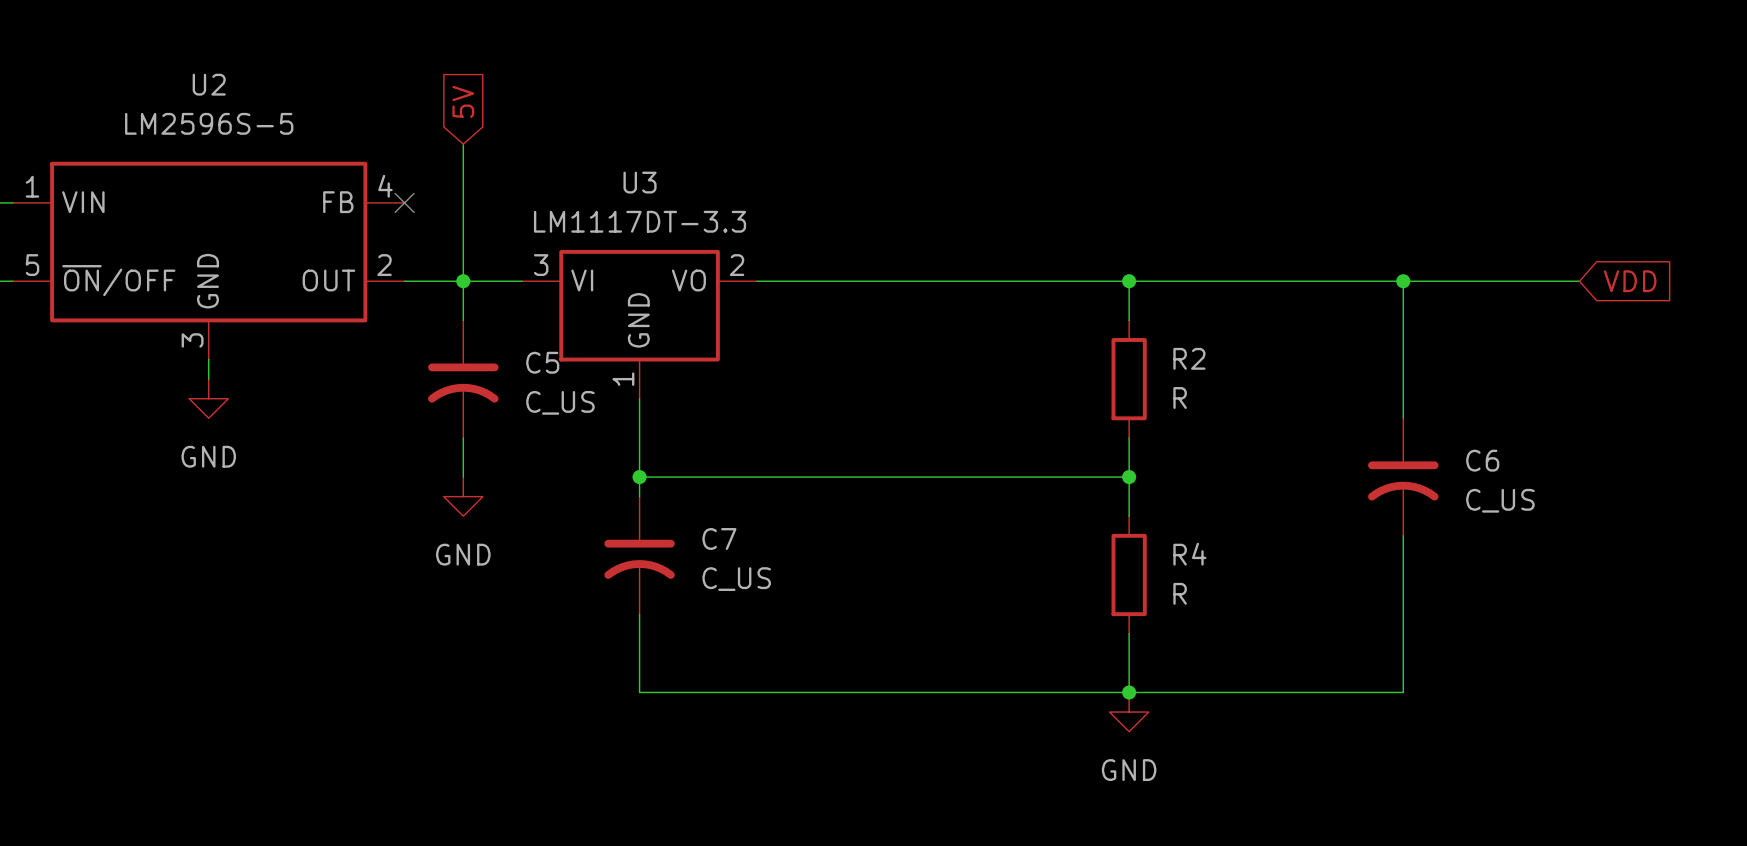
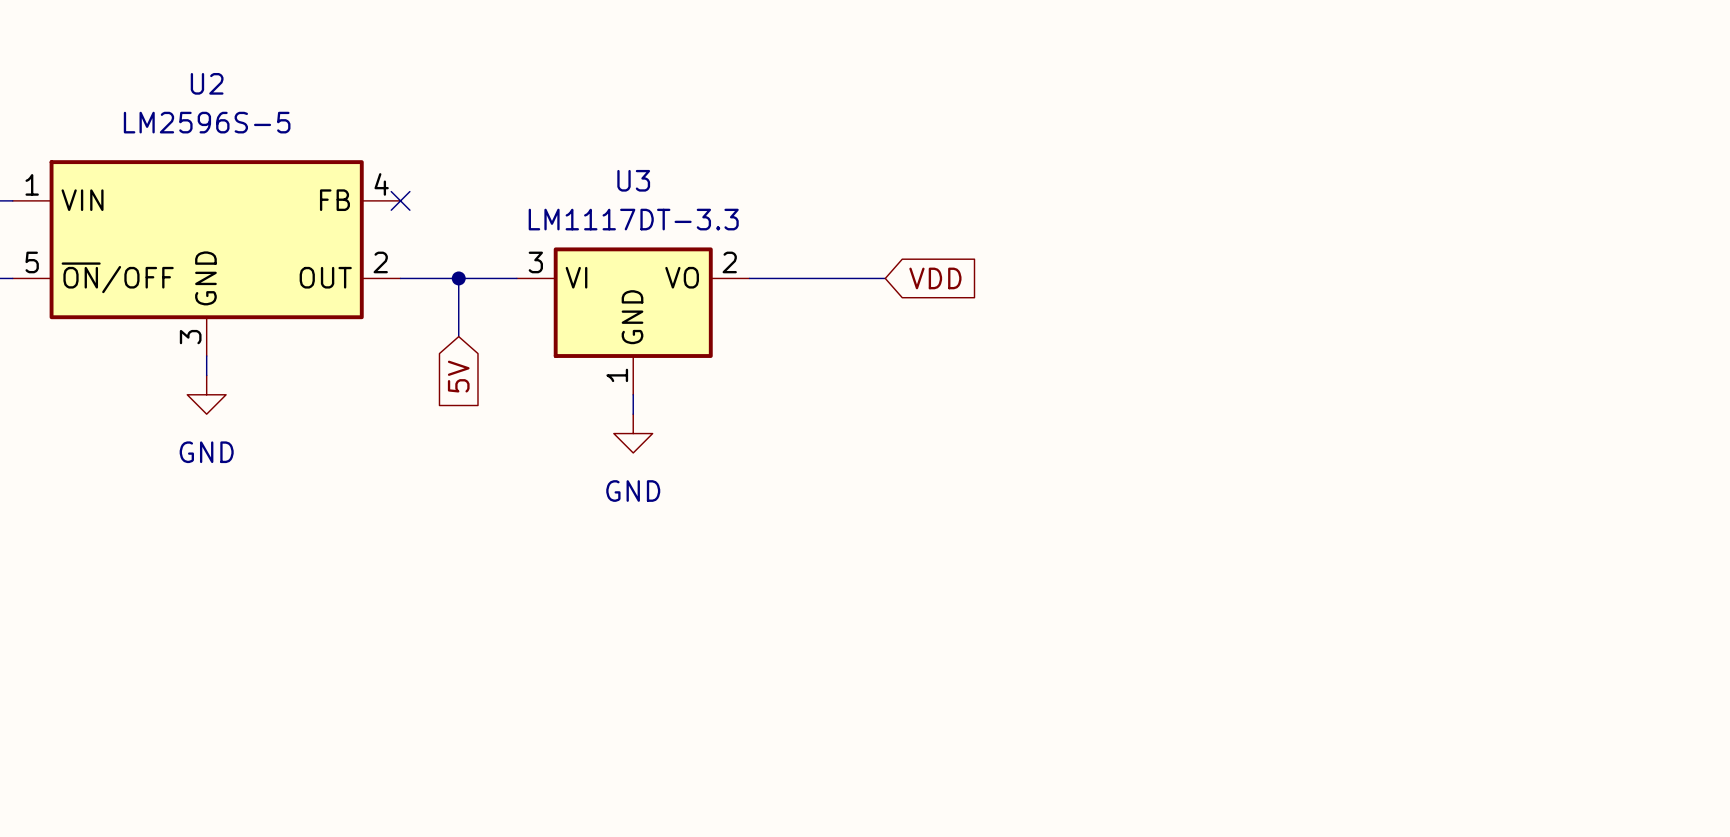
global label rotation: 0° (463, 101) -> 180° (458, 376)
global label position: 5V (463, 101) -> 5V (458, 376)
wire: (463, 144) (463, 281) -> none
wire: (894, 281) (1579, 281) -> none
global label: none -> VDD (935, 278)
wire: (1129, 281) (1129, 320) -> none
junction: (1129, 281) -> none
wire: (1403, 281) (1403, 418) -> none
junction: (1403, 281) -> none
global label: VDD (1630, 281) -> none
C5: C_US (463, 379) -> none
R2: R (1129, 379) -> none
wire: (639, 418) (639, 496) -> none
wire: (463, 437) (463, 477) -> none
wire: (1129, 437) (1129, 516) -> none
wire: (639, 477) (1129, 477) -> none
junction: (639, 477) -> none
junction: (1129, 477) -> none
C6: C_US (1403, 477) -> none
power symbol position: GND (463, 496) -> GND (633, 433)
wire: (1403, 535) (1403, 692) (639, 692) (639, 614) -> none
C7: C_US (639, 555) -> none
R4: R (1129, 574) -> none
wire: (1129, 633) (1129, 692) -> none
junction: (1129, 692) -> none
power symbol: GND (1129, 712) -> none

